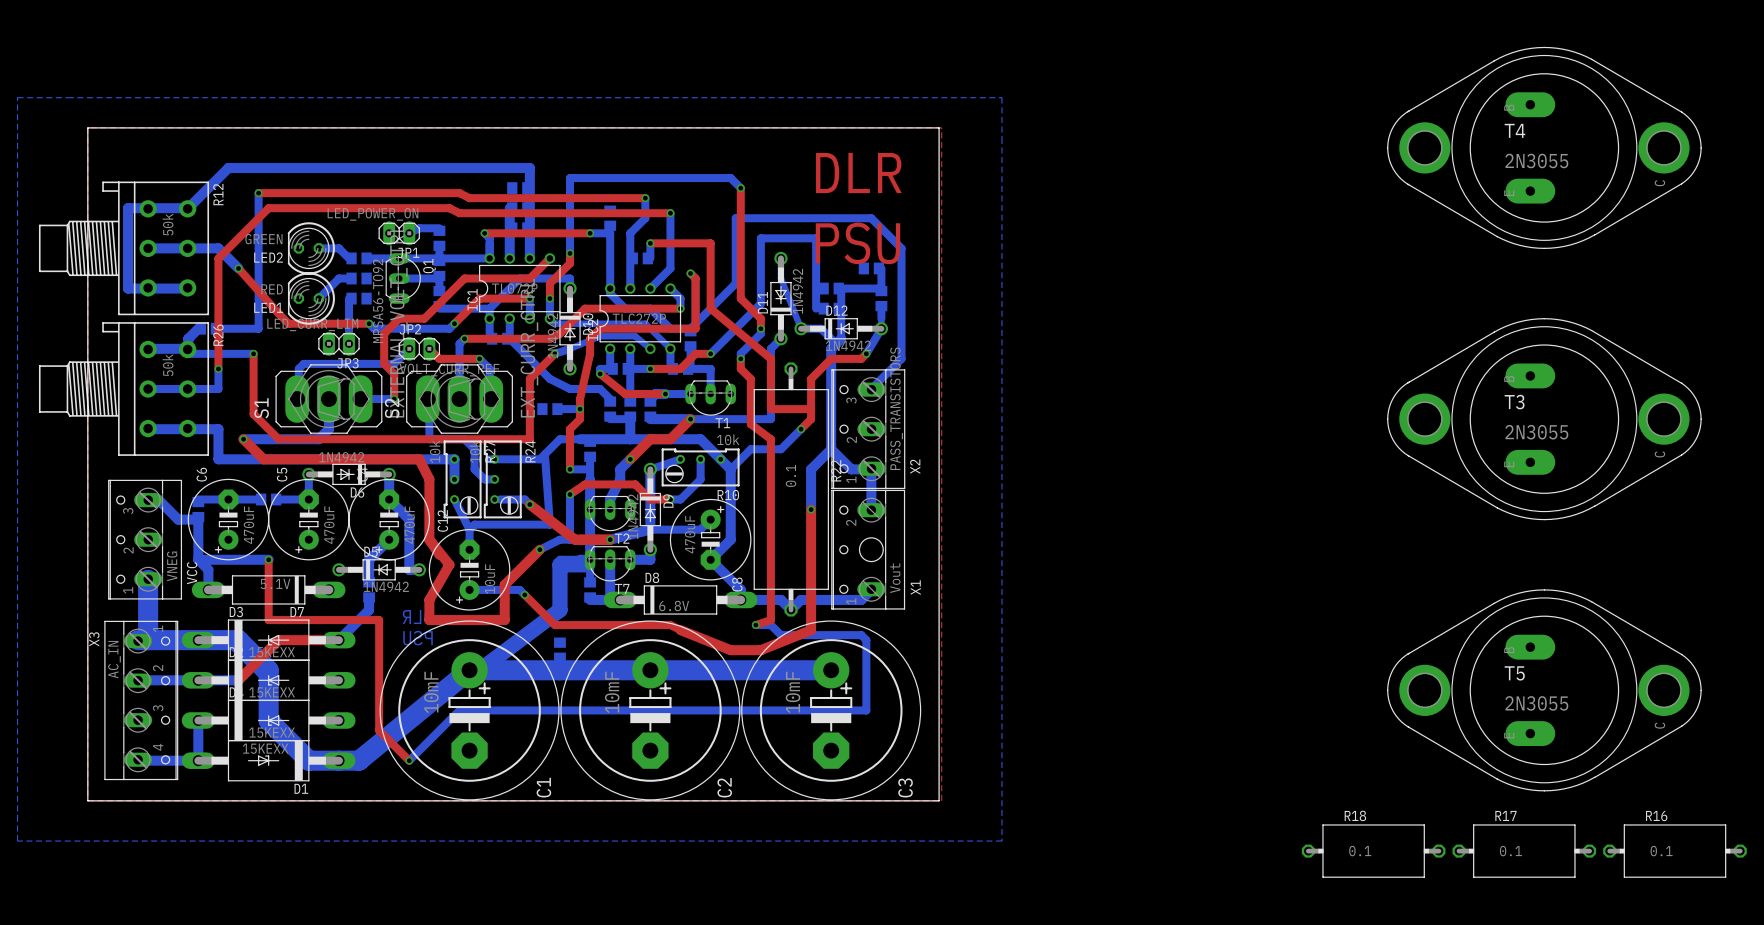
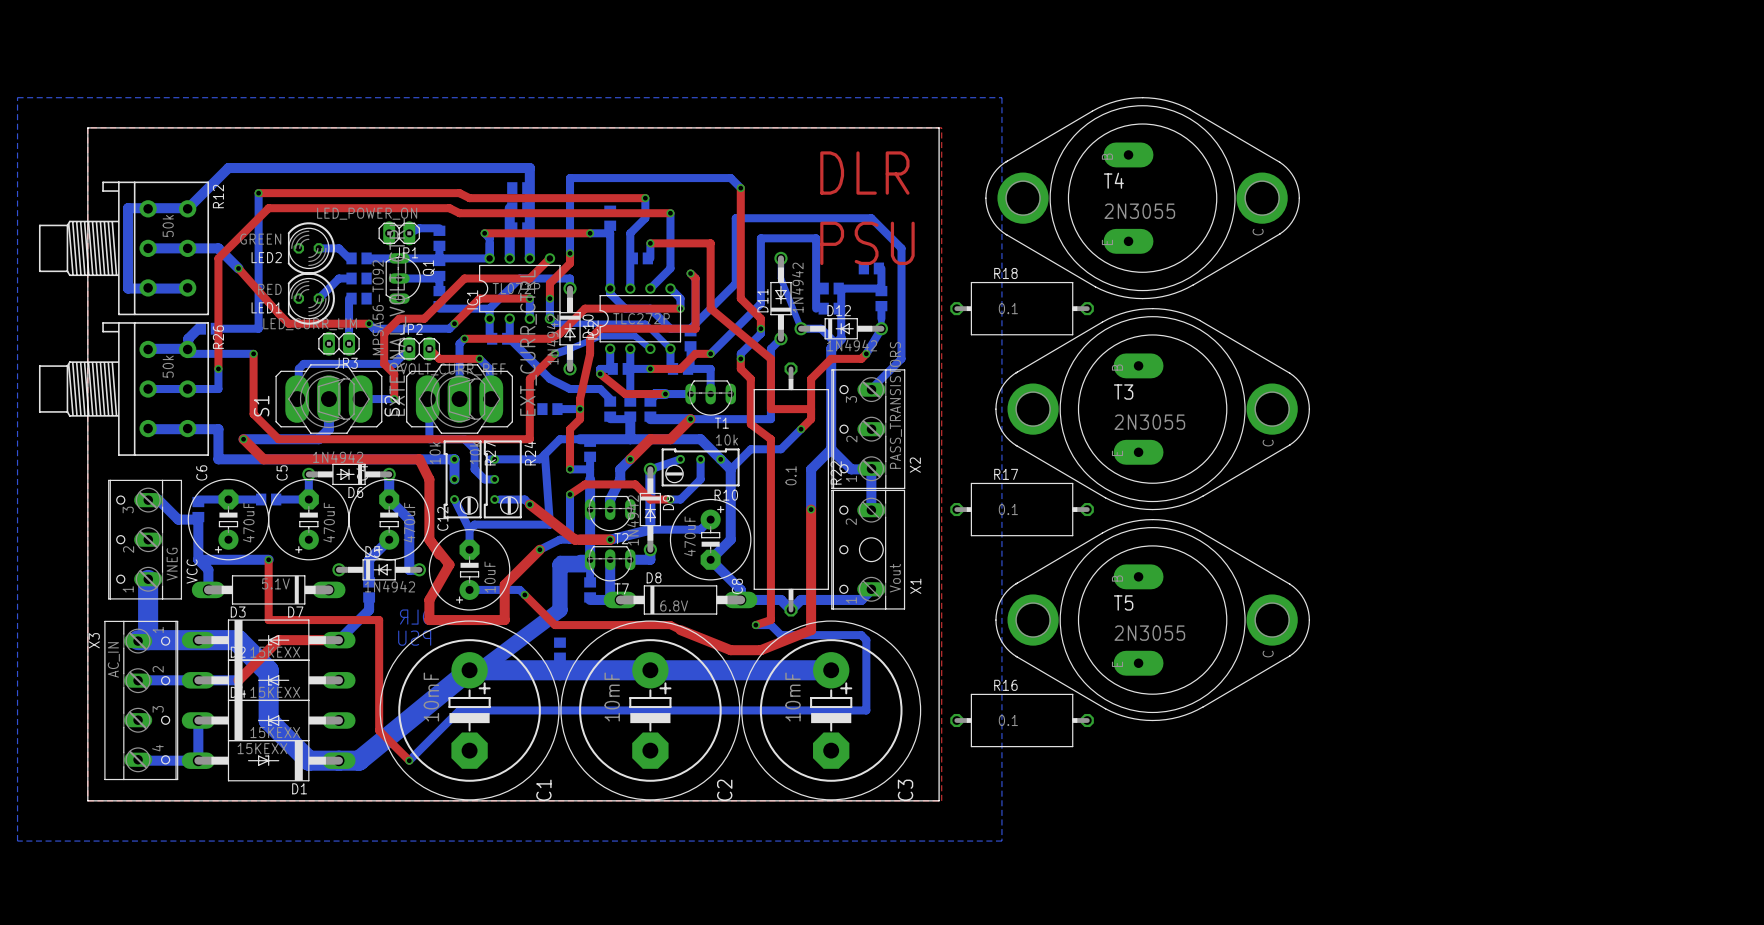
T4 position: (1544, 147) -> (1142, 198)
T3 position: (1544, 419) -> (1152, 409)
T5 position: (1544, 690) -> (1152, 620)
R18 position: (1373, 851) -> (1022, 308)
R17 position: (1524, 851) -> (1022, 509)
R16 position: (1674, 851) -> (1022, 720)

